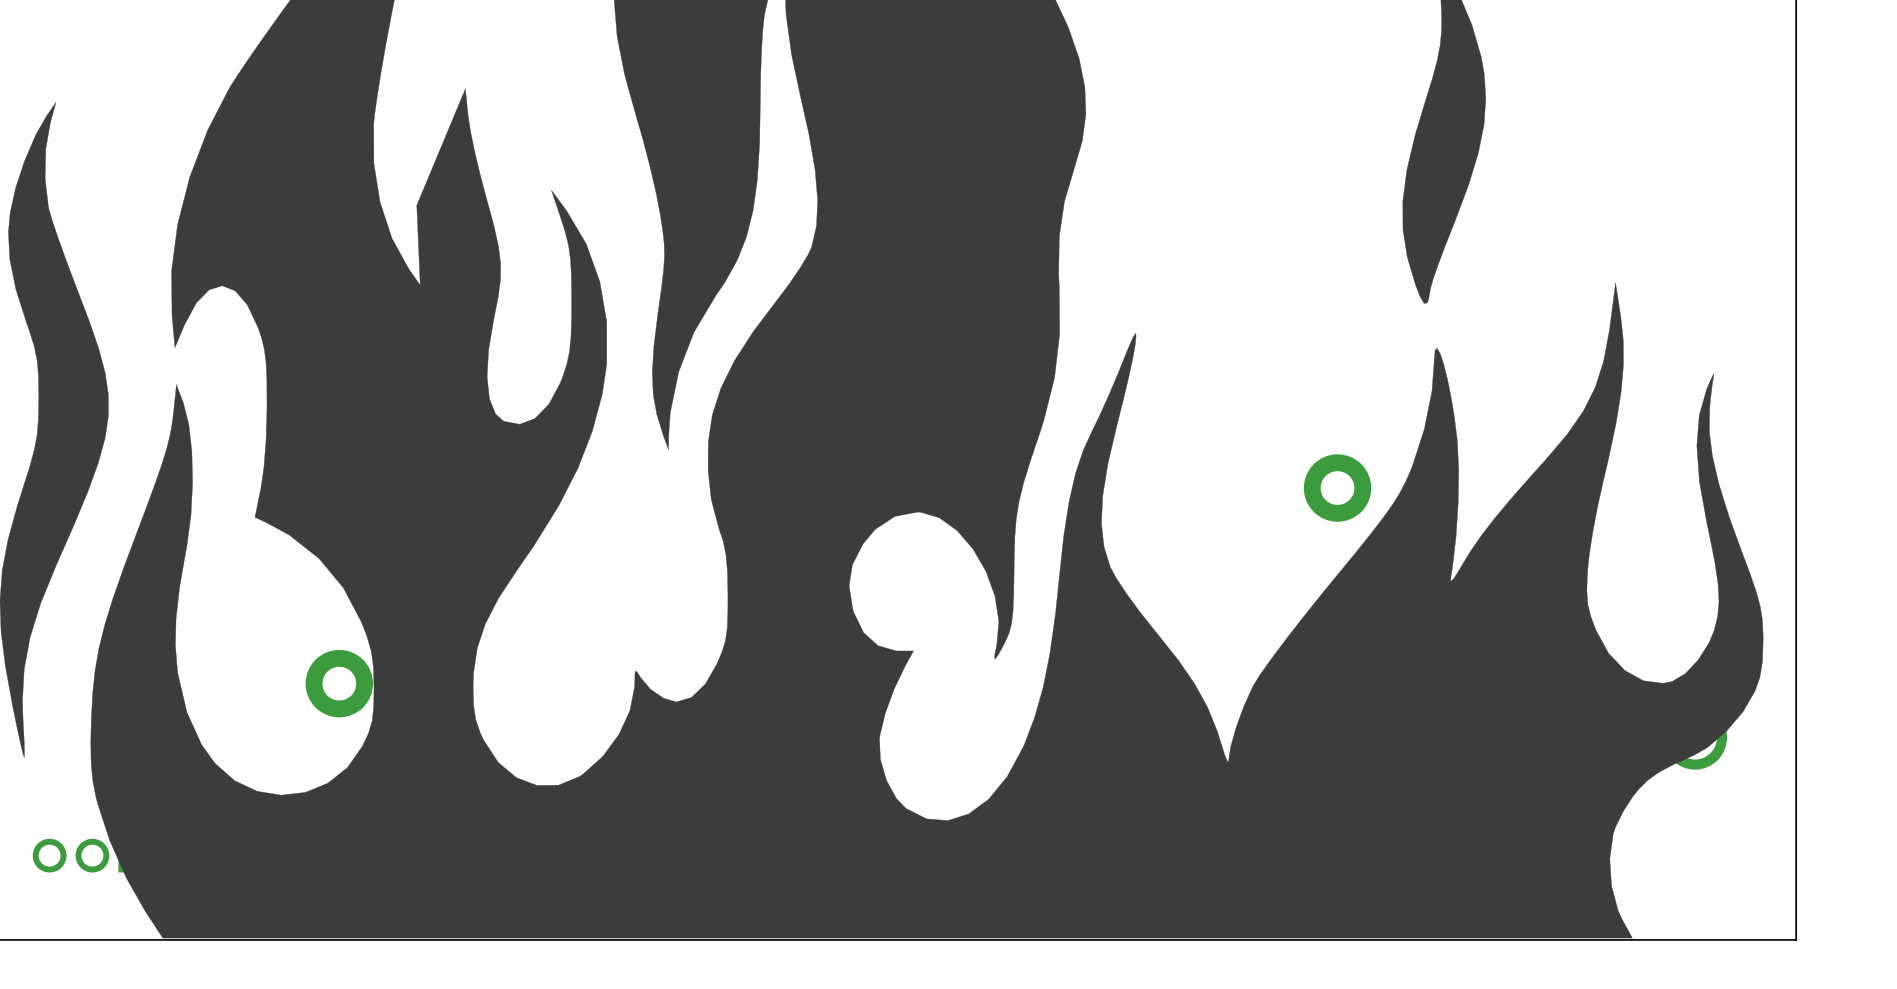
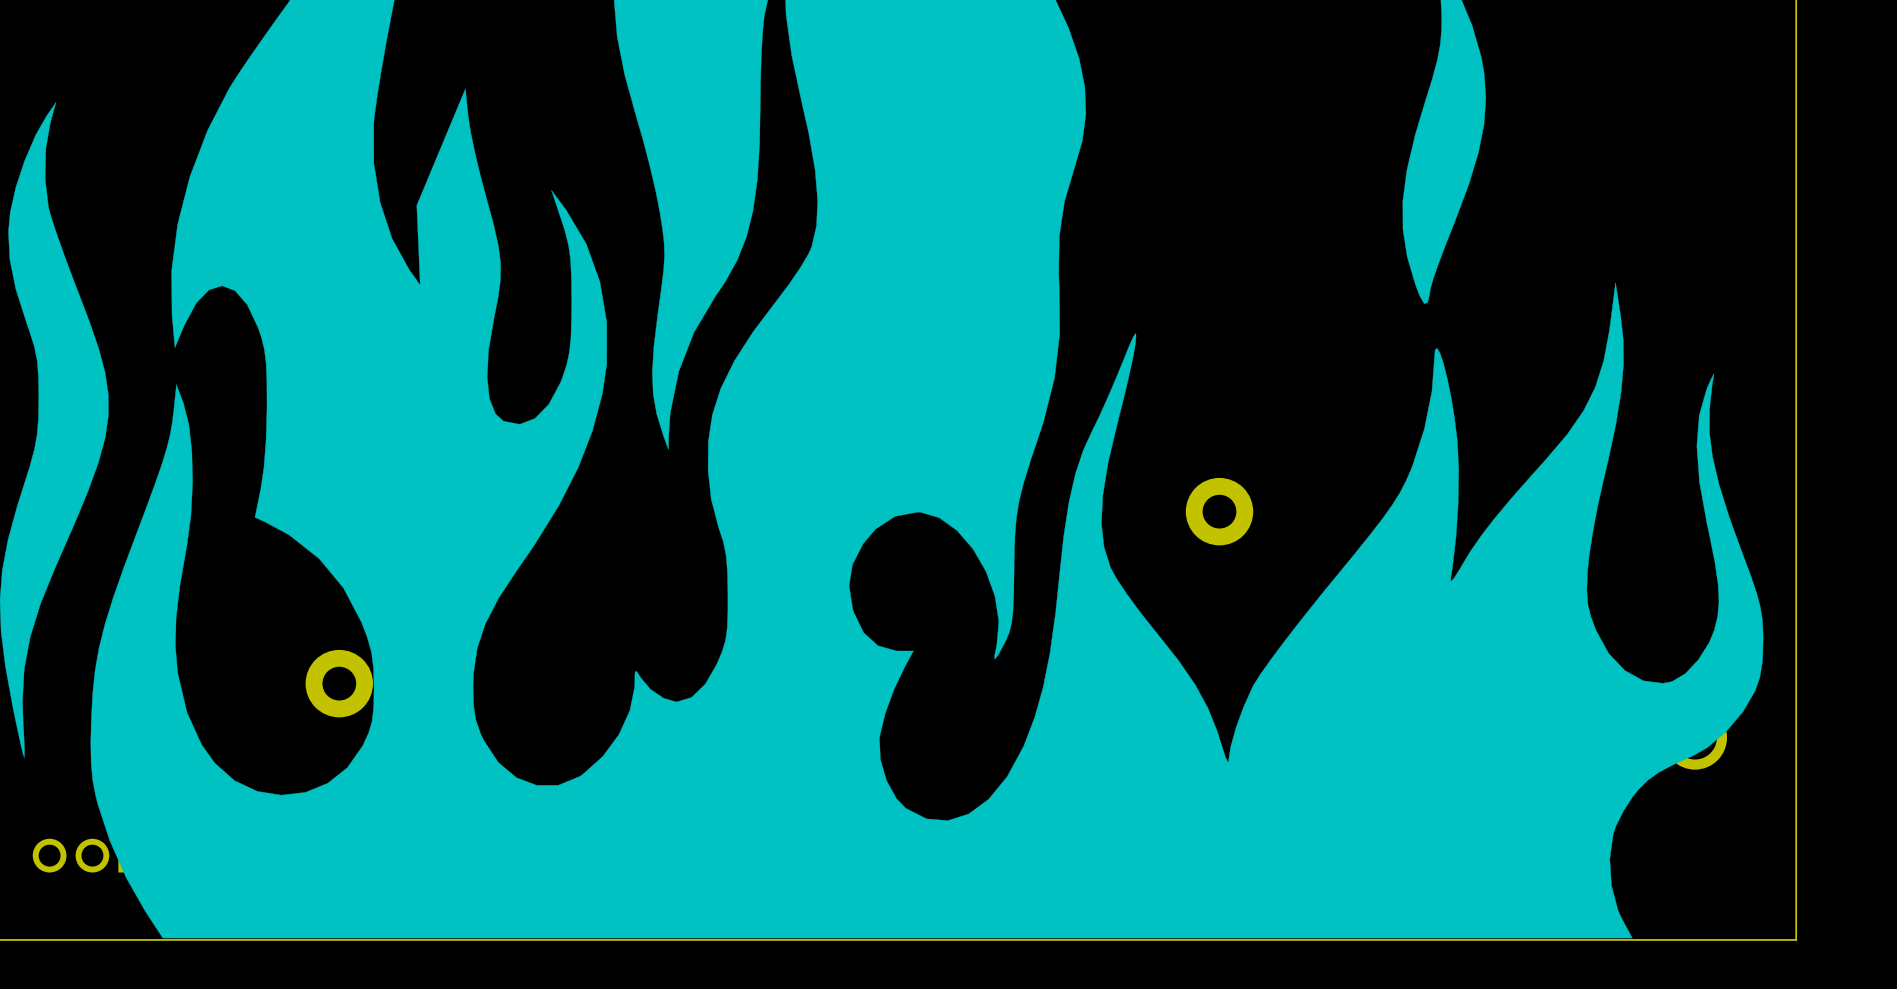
part position: (1337, 488) -> (1219, 511)

